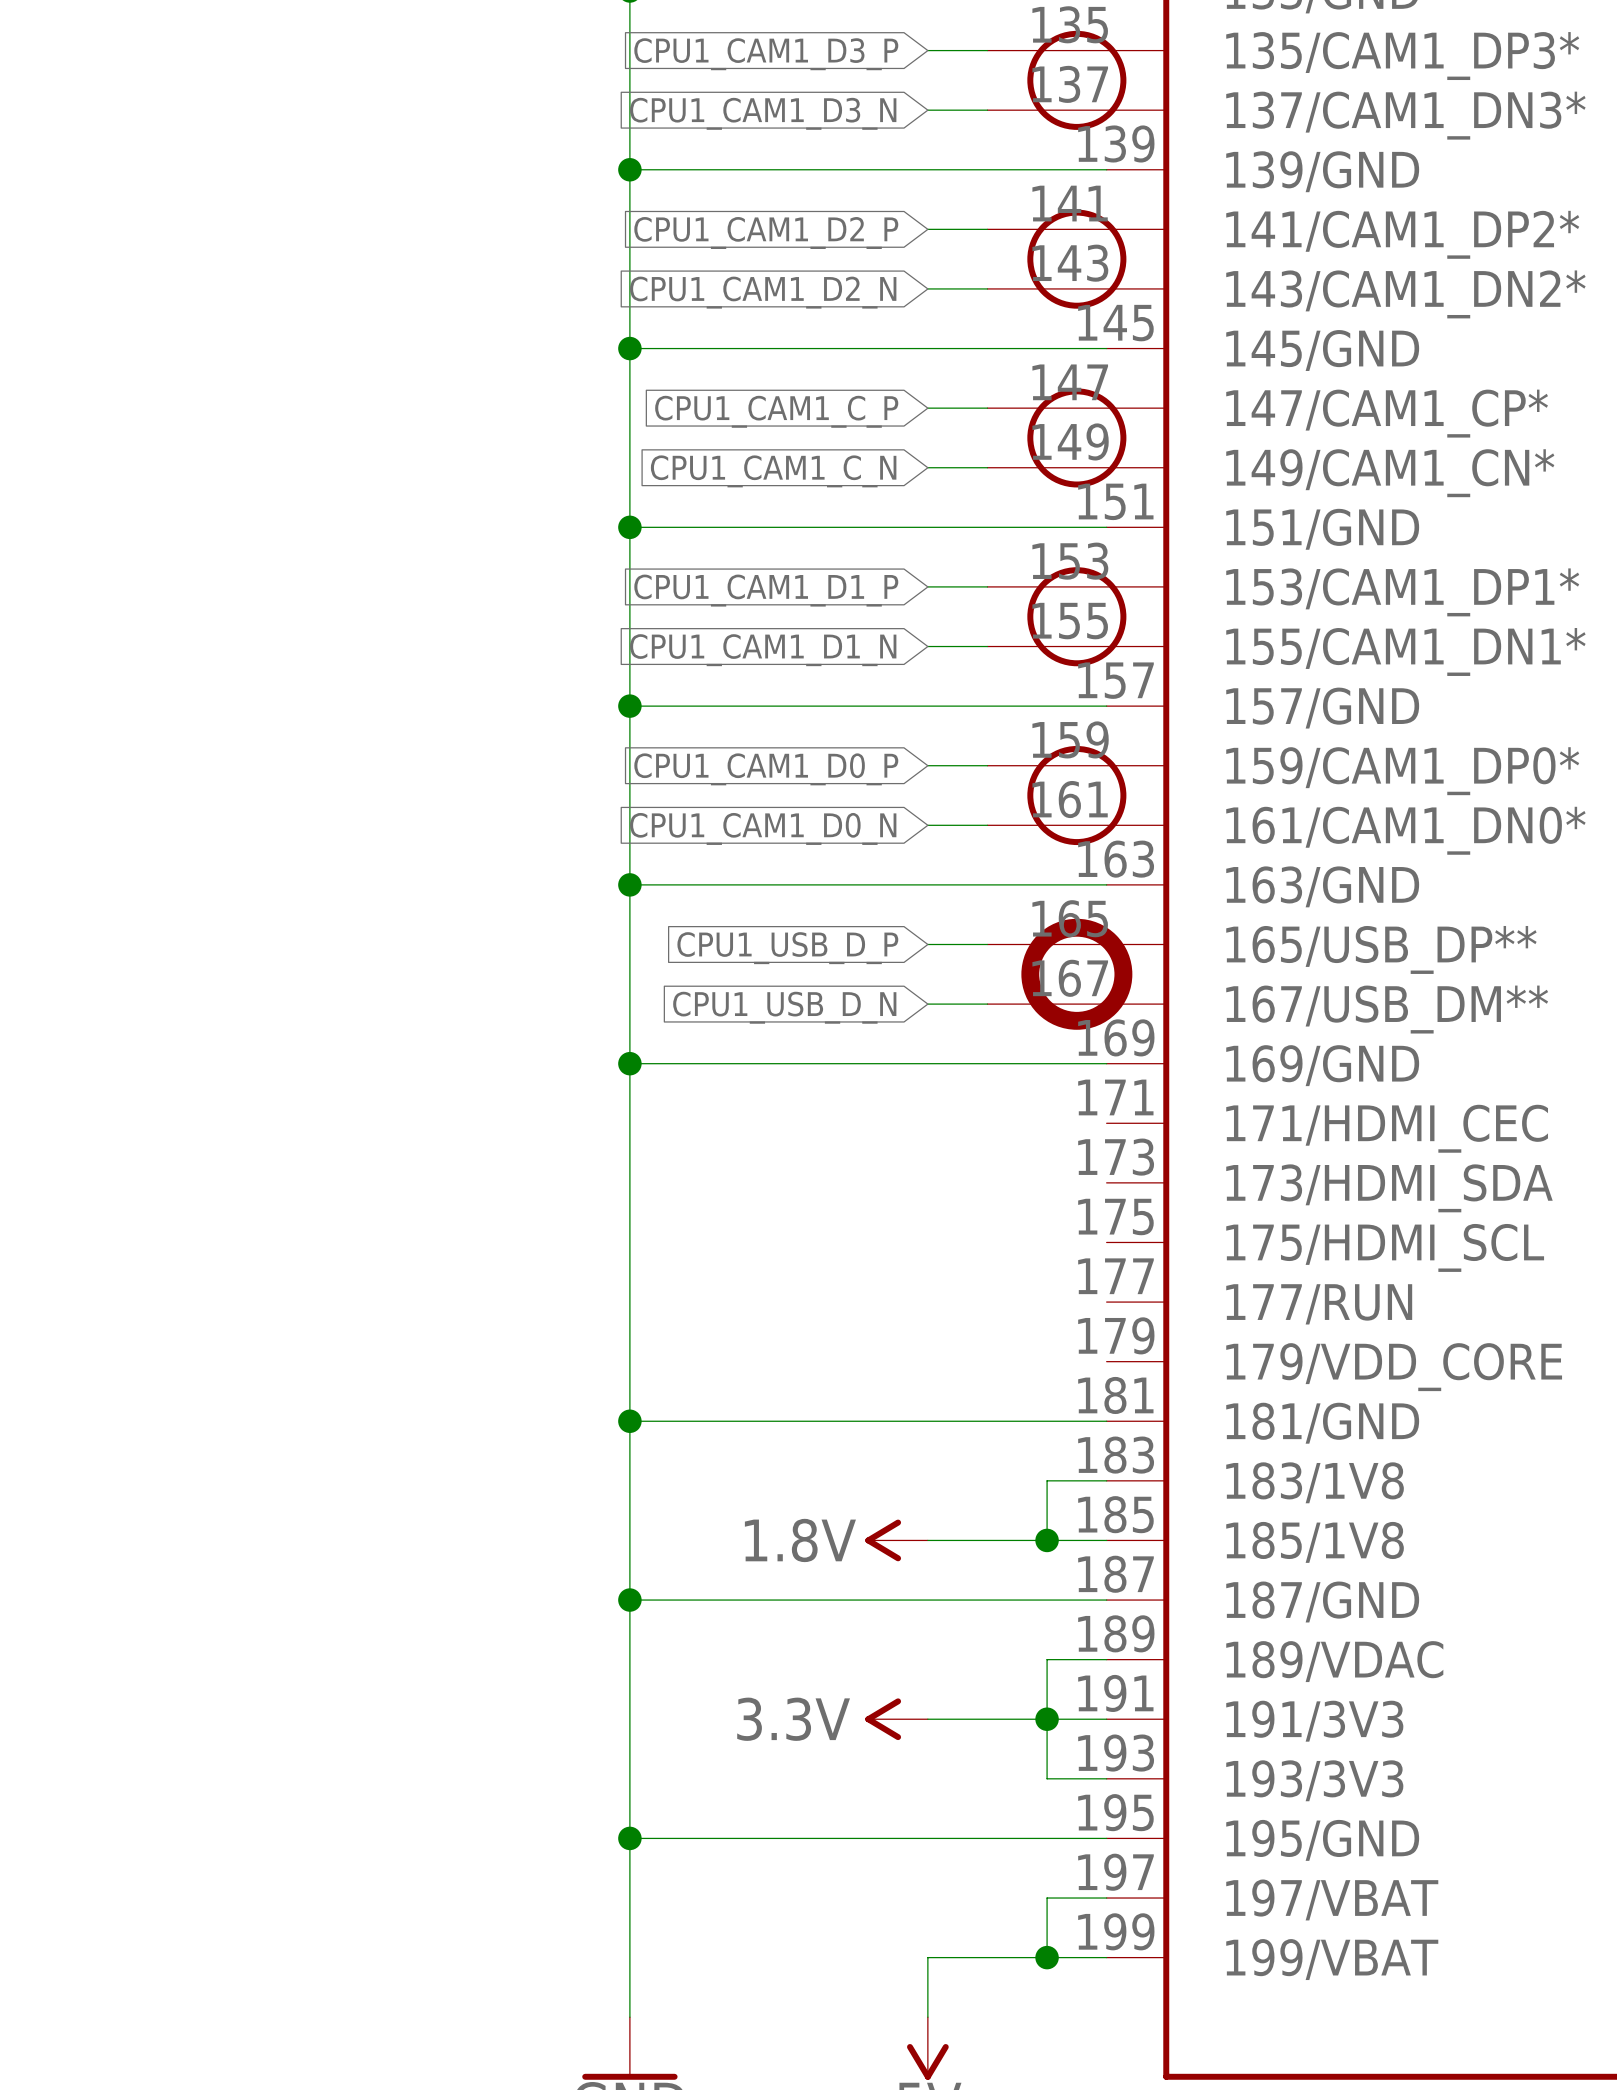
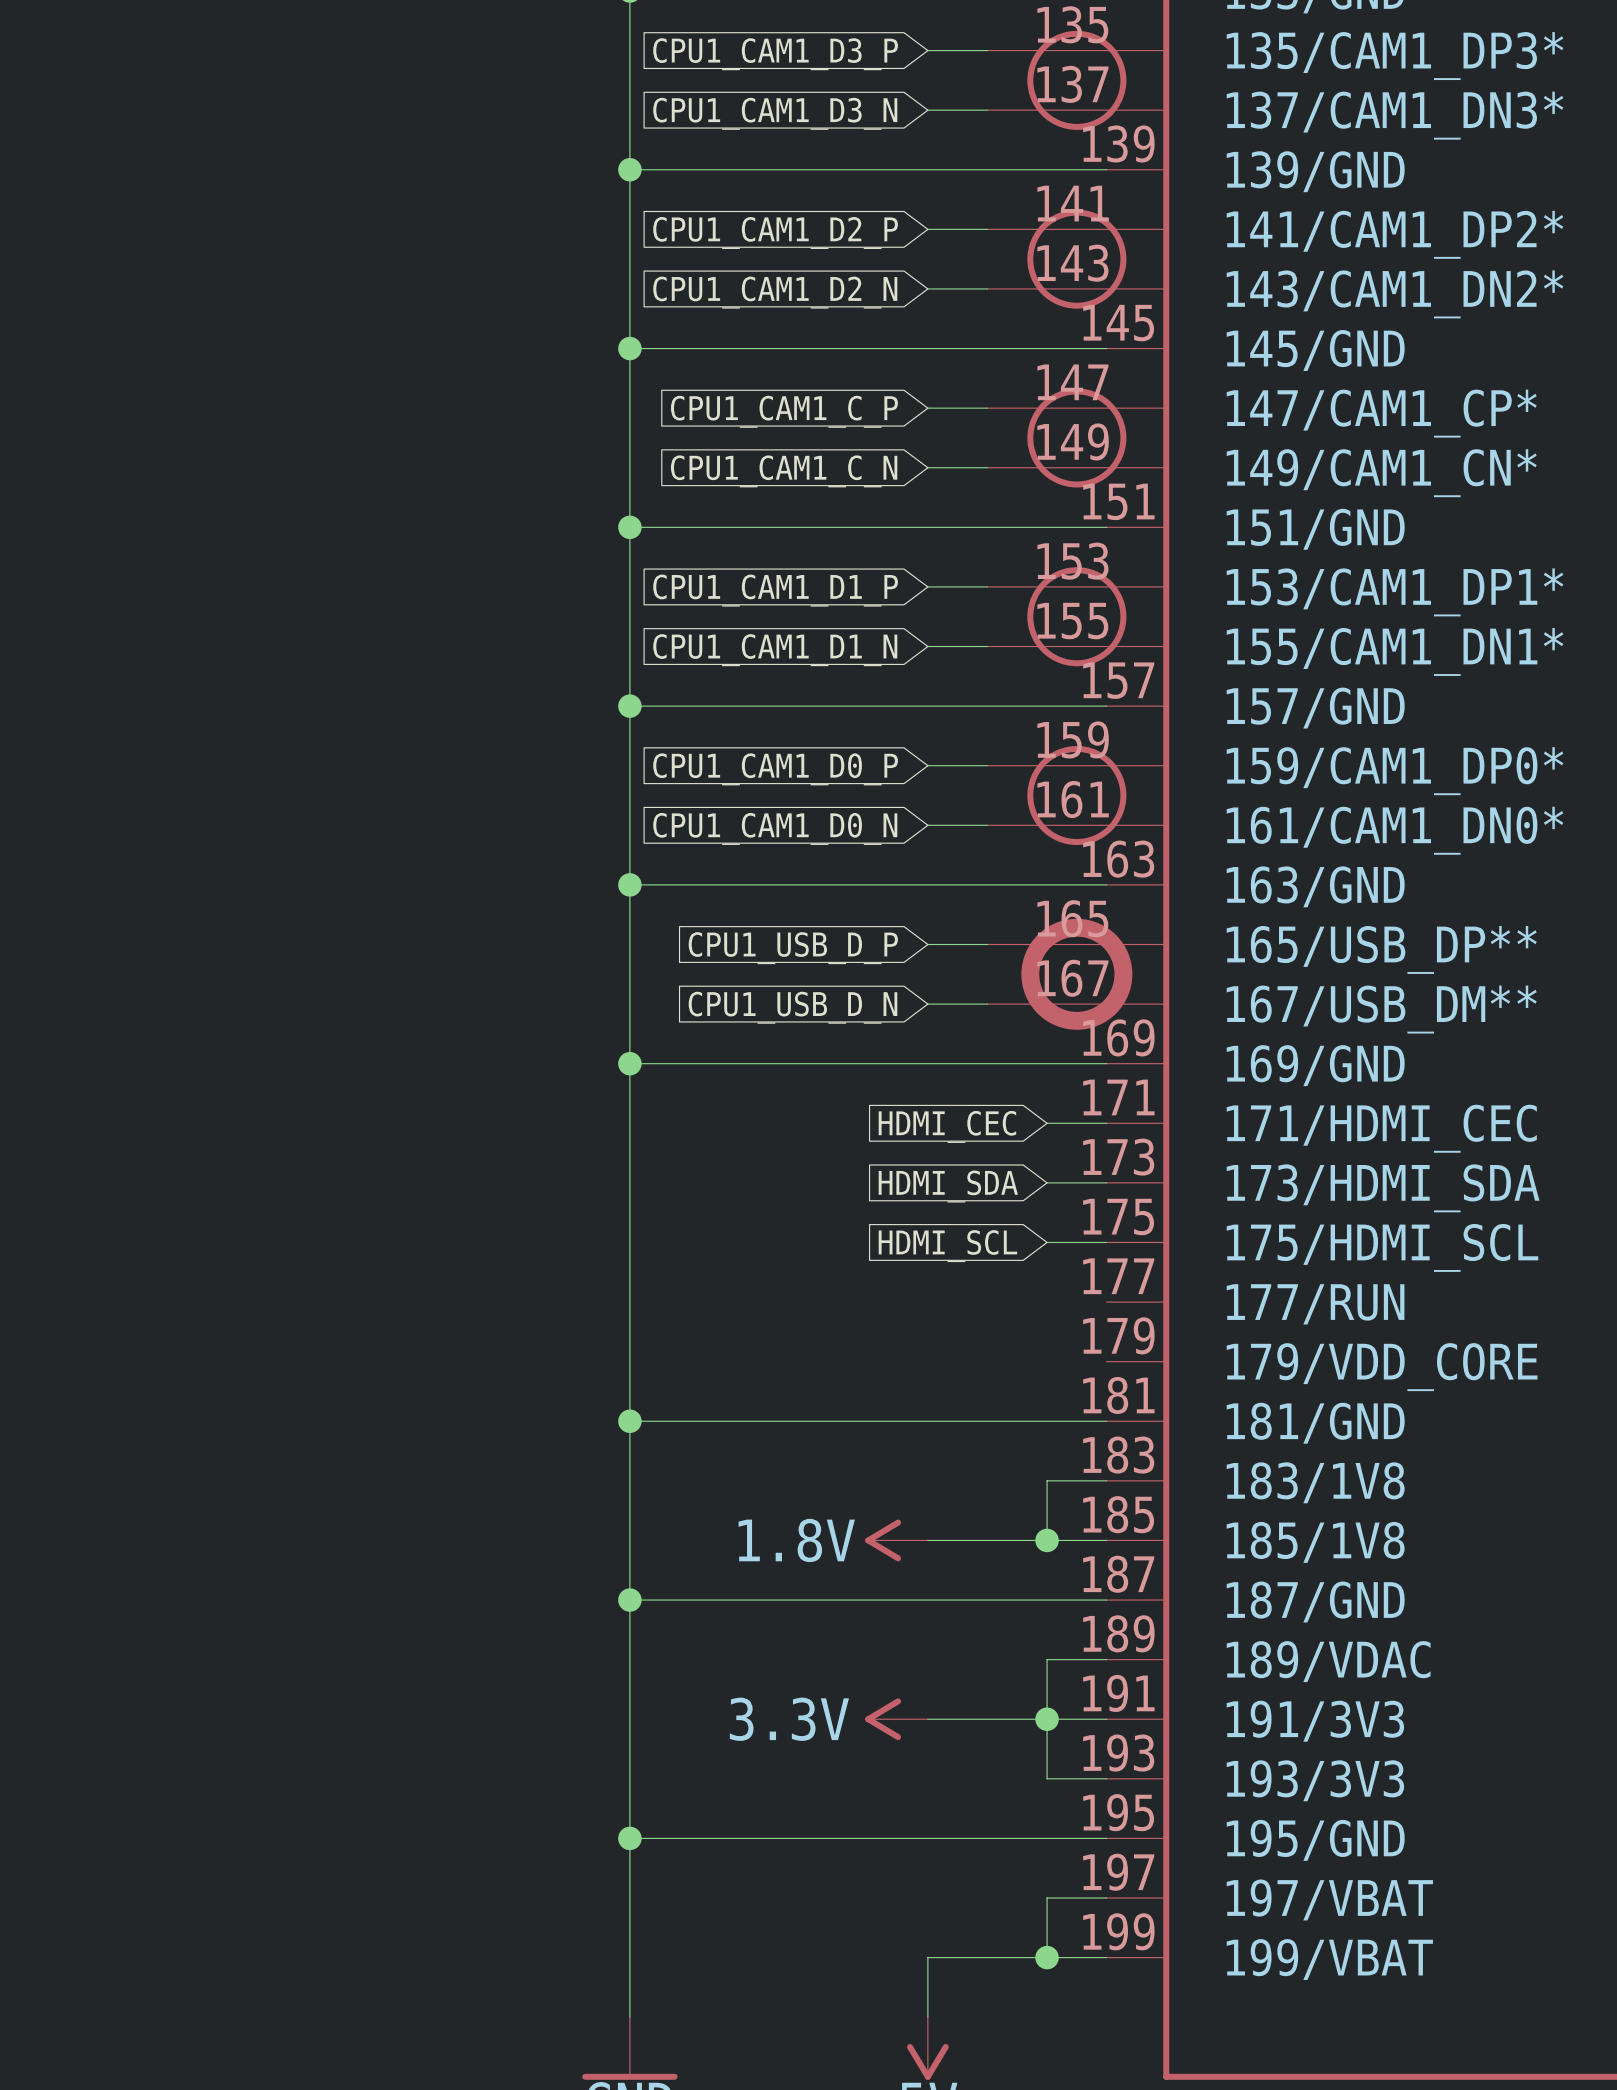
wire: none -> (1047, 1123) (1106, 1123)
global label: none -> HDMI_CEC (947, 1126)
wire: none -> (1047, 1182) (1106, 1182)
global label: none -> HDMI_SDA (948, 1186)
wire: none -> (1047, 1242) (1106, 1242)
global label: none -> HDMI_SCL (947, 1246)

